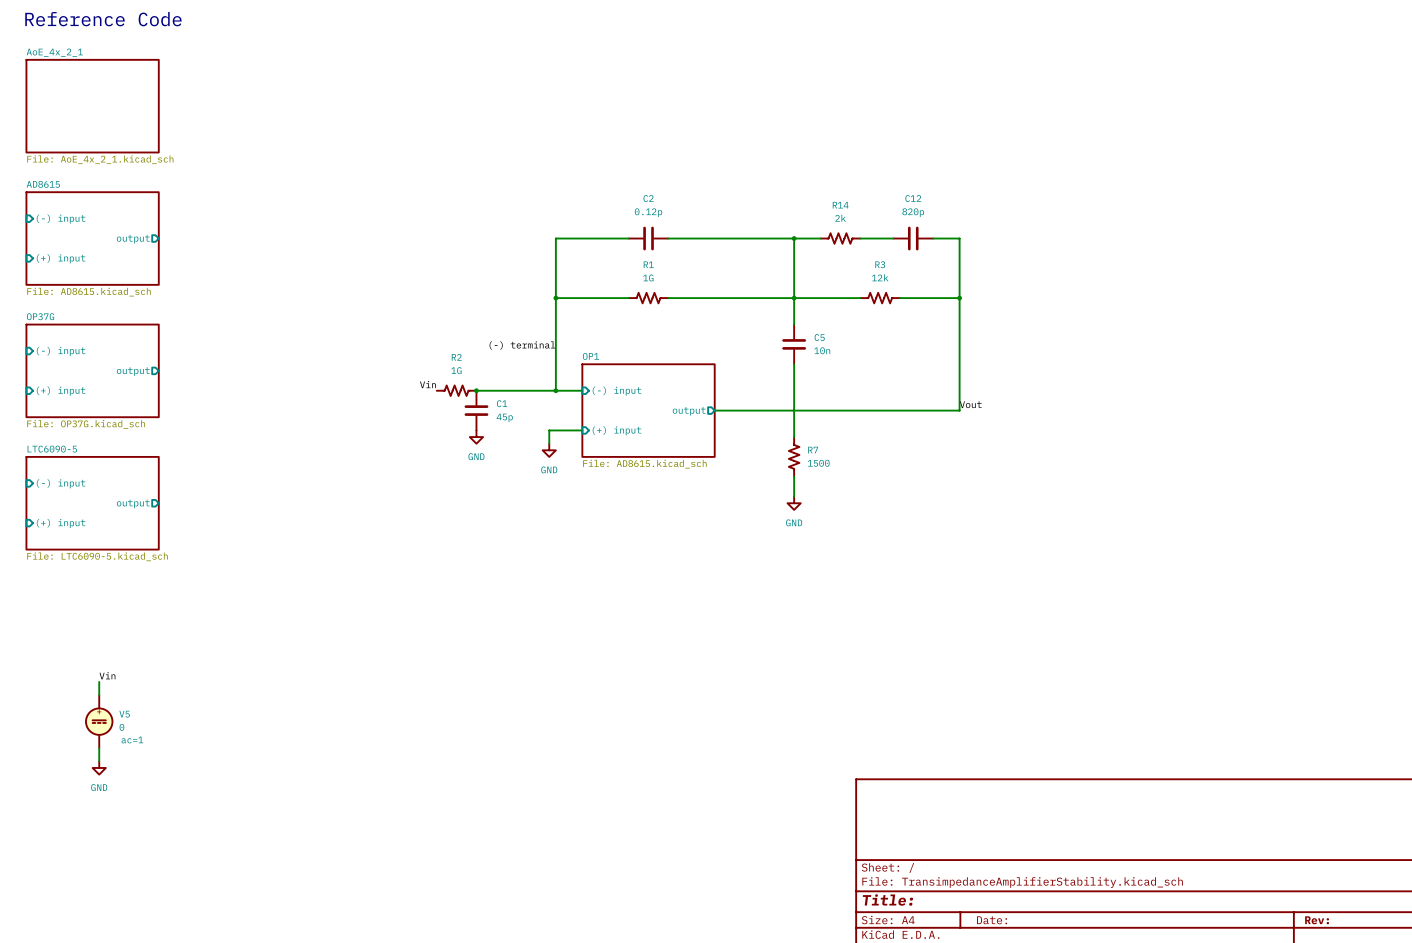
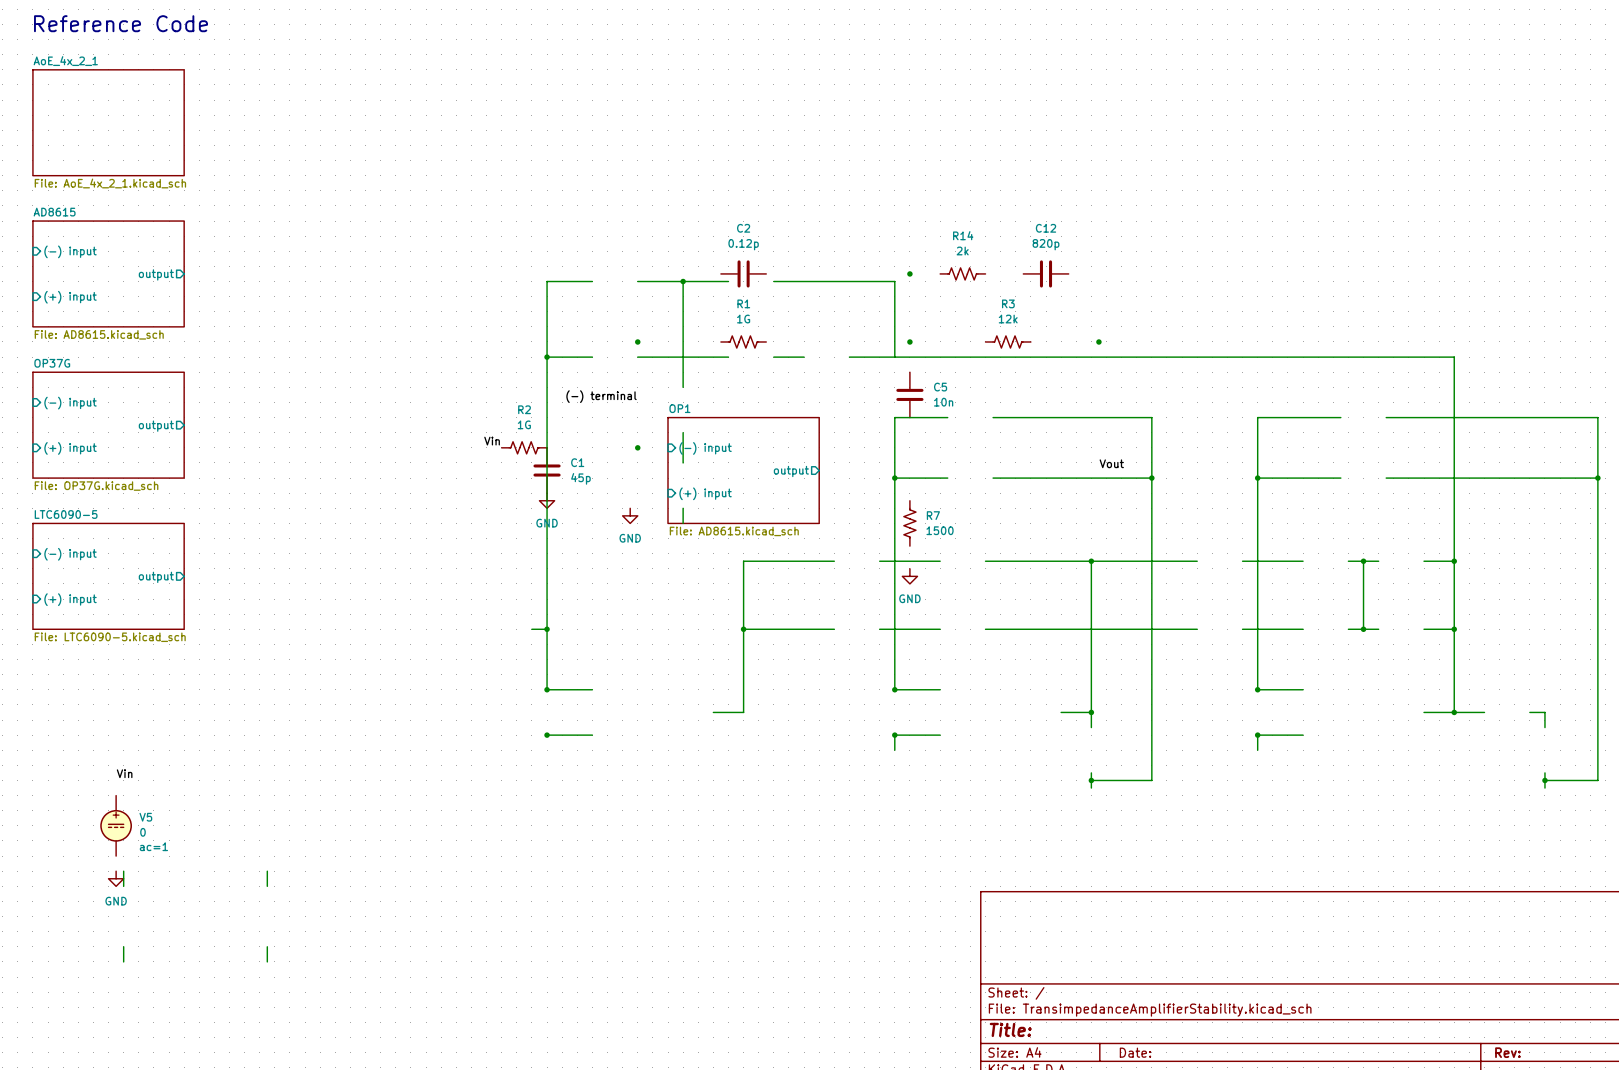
wire: (628, 238) (555, 238) (555, 390) -> none
wire: (668, 238) (820, 238) -> none
wire: (794, 238) (794, 324) -> none
wire: (860, 238) (893, 238) -> none
wire: (933, 238) (959, 238) (959, 410) (714, 410) -> none
wire: none -> (592, 281) (547, 281) (547, 689) (592, 689)
wire: none -> (637, 281) (728, 281)
wire: none -> (683, 281) (683, 387)
junction: none -> (683, 281)
wire: none -> (773, 281) (894, 281) (894, 357)
wire: (555, 298) (628, 298) -> none
wire: (668, 298) (860, 298) -> none
wire: (900, 298) (959, 298) -> none
wire: none -> (547, 357) (592, 357)
junction: none -> (547, 357)
wire: none -> (637, 357) (728, 357)
wire: none -> (773, 357) (804, 357)
wire: none -> (849, 357) (1454, 357) (1454, 712)
wire: (794, 364) (794, 437) -> none
wire: none -> (947, 417) (894, 417) (894, 689) (940, 689)
wire: none -> (993, 417) (1151, 417) (1151, 780) (1091, 780)
wire: none -> (1340, 417) (1257, 417) (1257, 689) (1303, 689)
wire: none -> (1386, 417) (1597, 417) (1597, 780) (1544, 780)
wire: none -> (683, 432) (683, 462)
wire: (476, 390) (582, 390) -> none
junction: (476, 390) -> none
wire: none -> (894, 478) (947, 478)
junction: none -> (894, 478)
wire: none -> (993, 478) (1151, 478)
junction: none -> (1151, 478)
wire: none -> (1257, 478) (1340, 478)
junction: none -> (1257, 478)
wire: none -> (1386, 478) (1597, 478)
junction: none -> (1597, 478)
wire: (582, 430) (549, 430) (549, 443) -> none
wire: none -> (683, 508) (683, 523)
wire: (794, 476) (794, 496) -> none
wire: none -> (834, 561) (743, 561) (743, 712) (713, 712)
wire: none -> (879, 561) (940, 561)
wire: none -> (985, 561) (1197, 561)
wire: none -> (1091, 561) (1091, 727)
junction: none -> (1091, 561)
wire: none -> (1242, 561) (1303, 561)
wire: none -> (1348, 561) (1378, 561)
wire: none -> (1363, 561) (1363, 629)
junction: none -> (1363, 561)
wire: none -> (1424, 561) (1454, 561)
junction: none -> (1454, 561)
wire: none -> (531, 629) (547, 629)
junction: none -> (547, 629)
wire: none -> (743, 629) (834, 629)
junction: none -> (743, 629)
wire: none -> (879, 629) (940, 629)
wire: none -> (985, 629) (1197, 629)
wire: none -> (1242, 629) (1303, 629)
wire: none -> (1348, 629) (1378, 629)
junction: none -> (1363, 629)
wire: none -> (1424, 629) (1454, 629)
junction: none -> (1454, 629)
junction: none -> (547, 689)
junction: none -> (894, 689)
junction: none -> (1257, 689)
wire: none -> (1061, 712) (1091, 712)
junction: none -> (1091, 712)
wire: none -> (1424, 712) (1484, 712)
junction: none -> (1454, 712)
wire: none -> (1529, 712) (1544, 712) (1544, 727)
wire: none -> (547, 735) (592, 735)
junction: none -> (547, 735)
junction: none -> (894, 735)
wire: none -> (940, 735) (894, 735) (894, 750)
junction: none -> (1257, 735)
wire: none -> (1303, 735) (1257, 735) (1257, 750)
wire: none -> (1091, 772) (1091, 788)
wire: none -> (1544, 772) (1544, 788)
wire: (99, 681) (99, 695) -> (123, 871) (123, 886)
junction: none -> (1091, 780)
junction: none -> (1544, 780)
wire: (99, 748) (99, 761) -> (123, 946) (123, 961)
wire: none -> (267, 871) (267, 886)
wire: none -> (267, 946) (267, 961)

